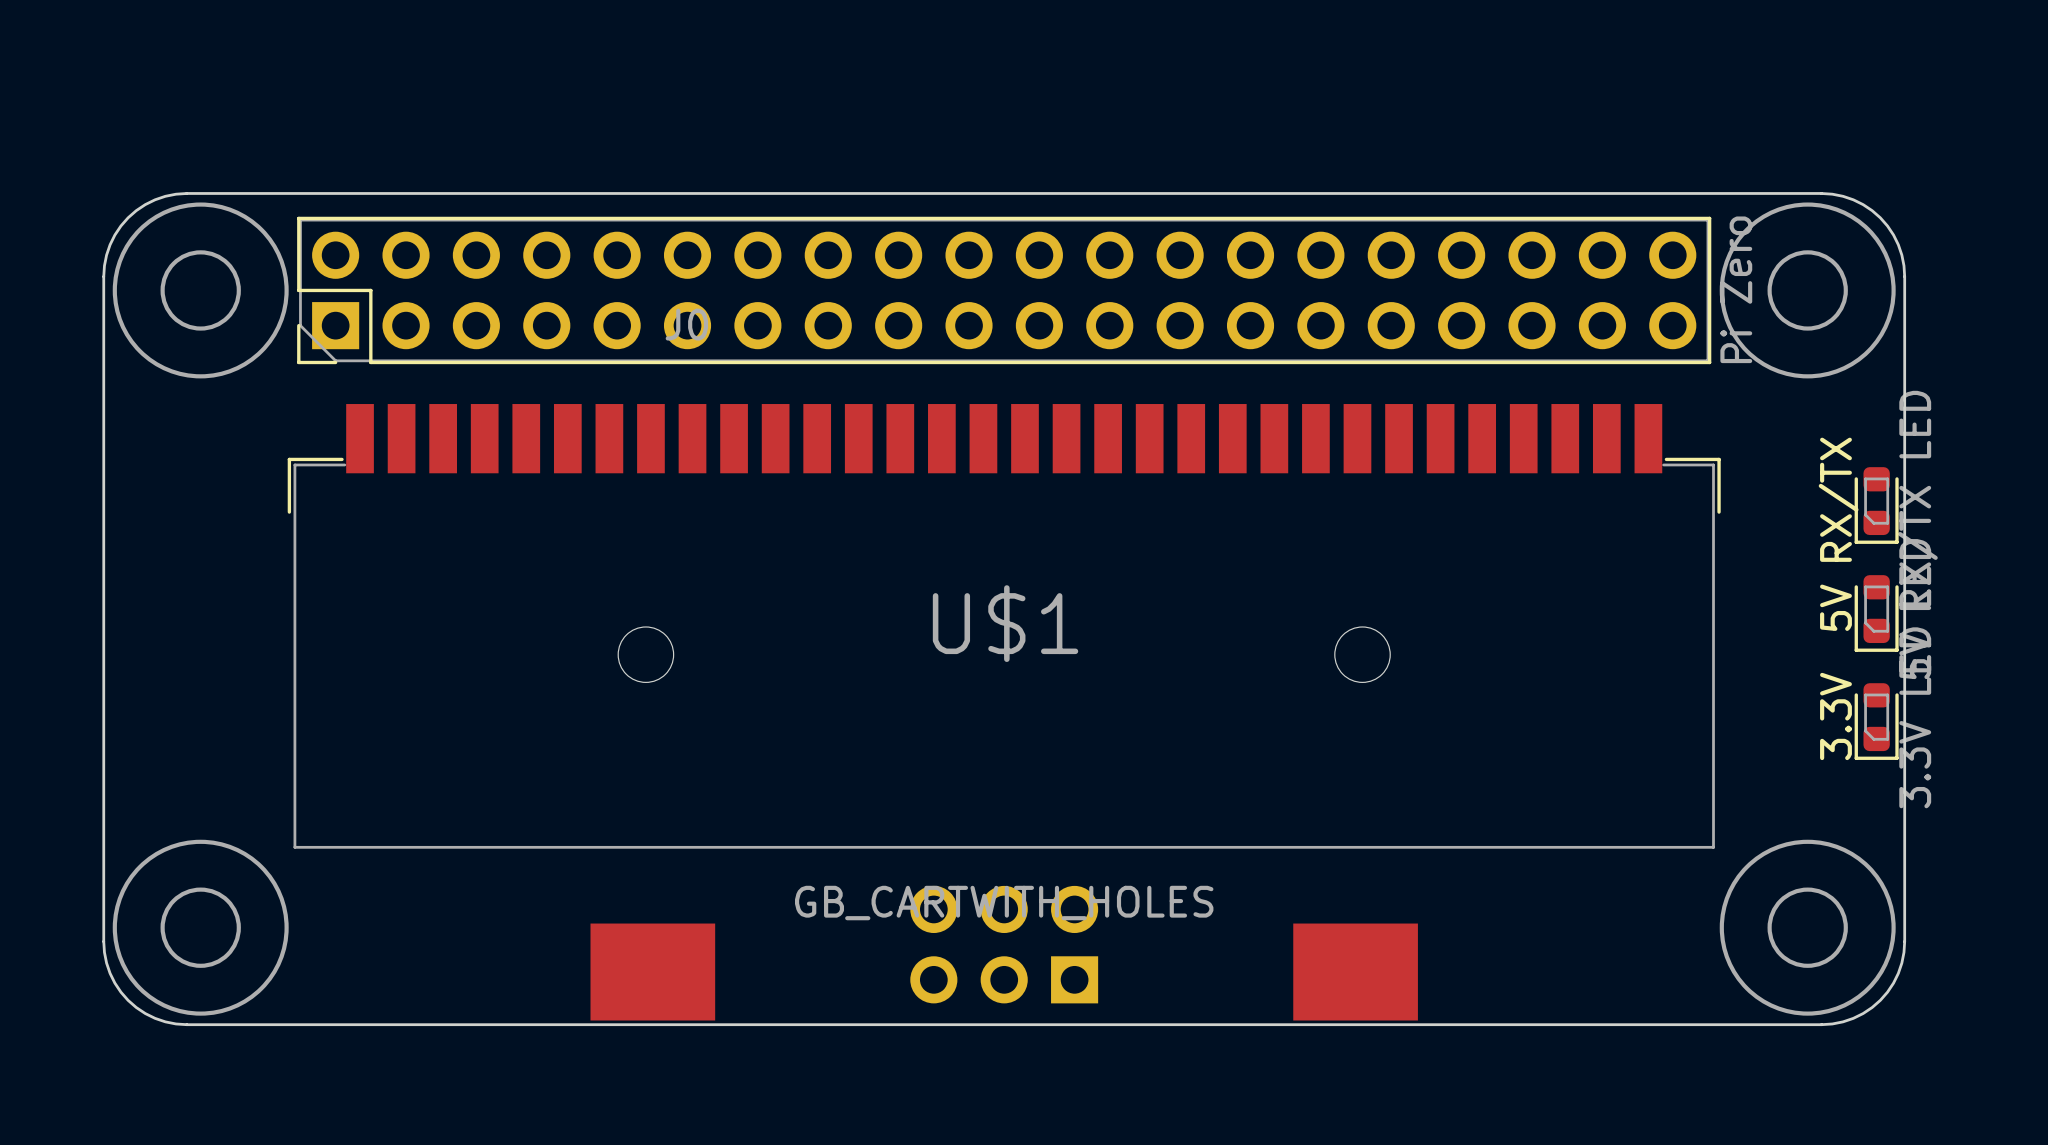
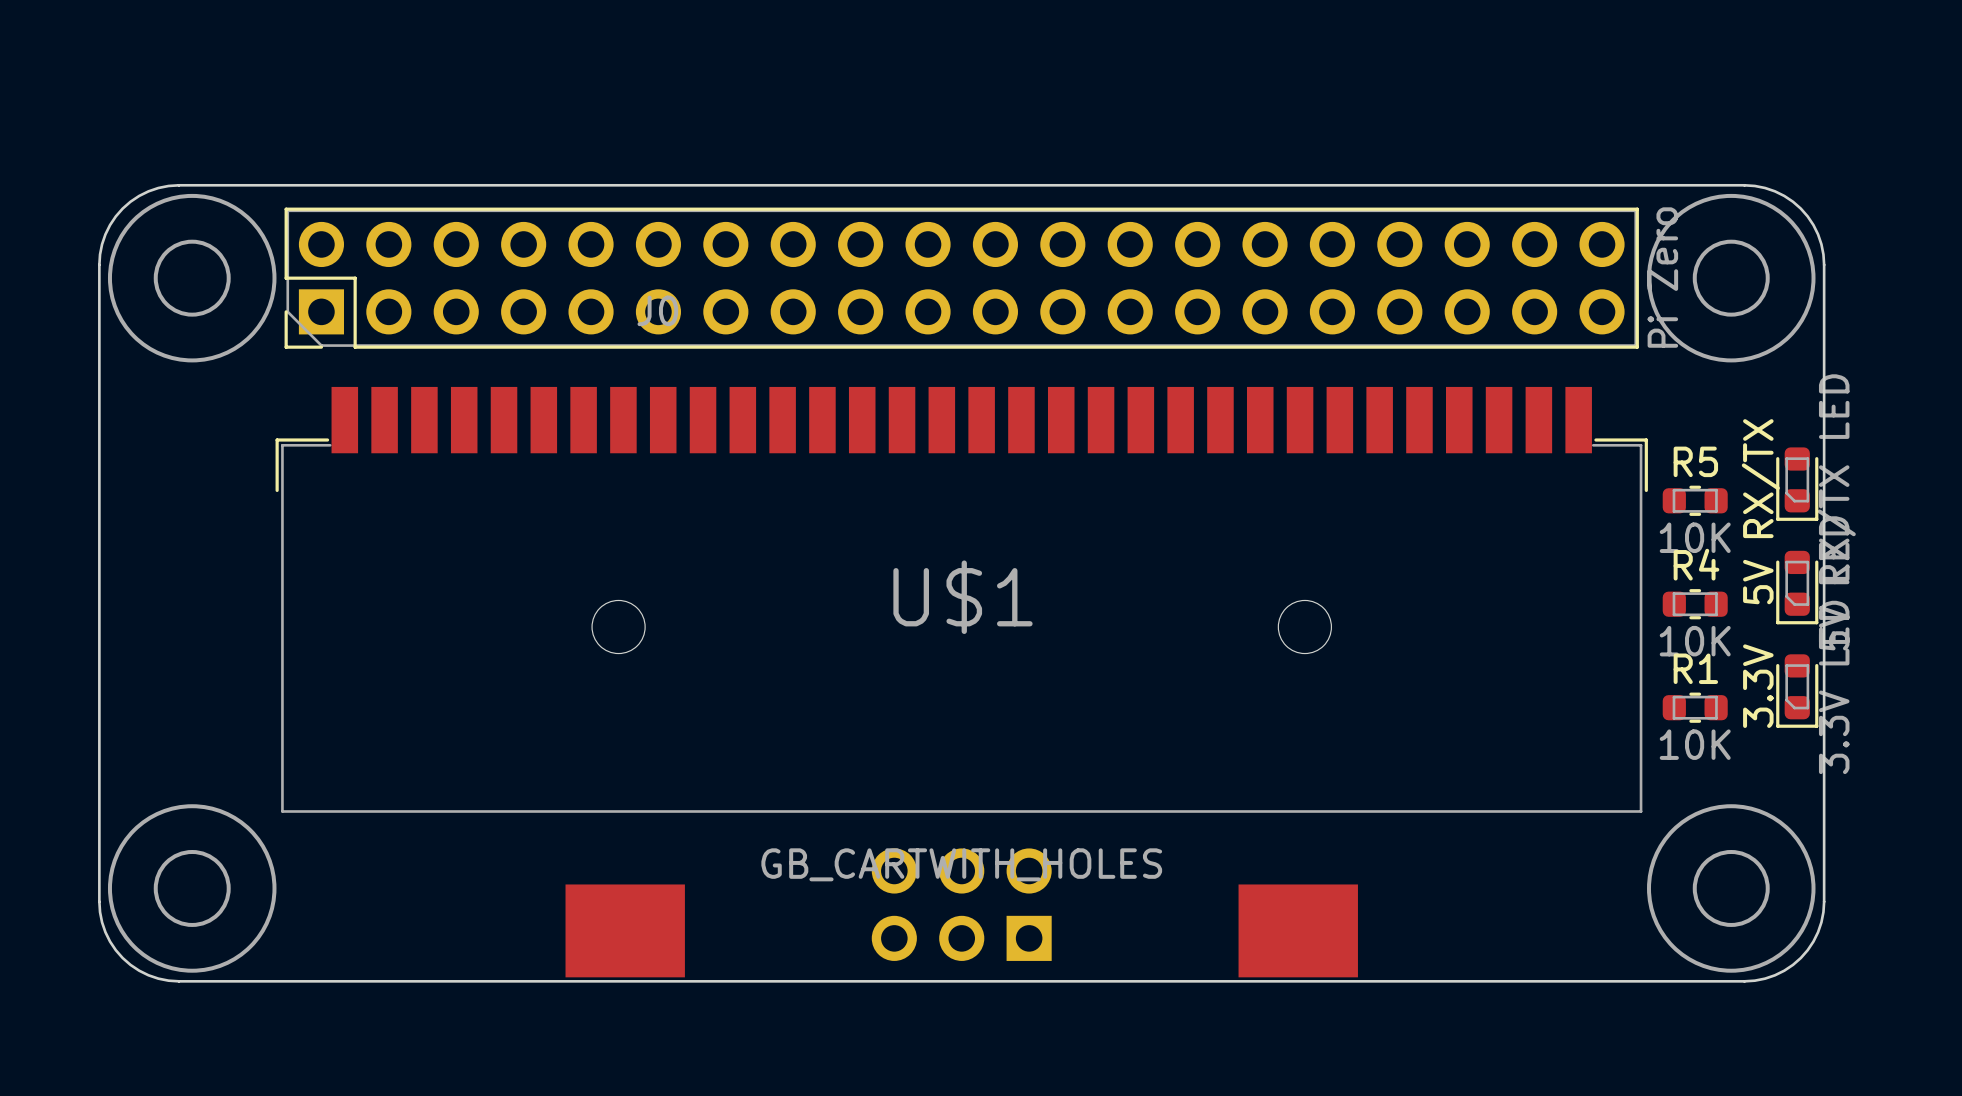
R5: none -> 10K (1695, 500)
R4: none -> 10K (1695, 604)
R1: none -> 10K (1695, 707)

